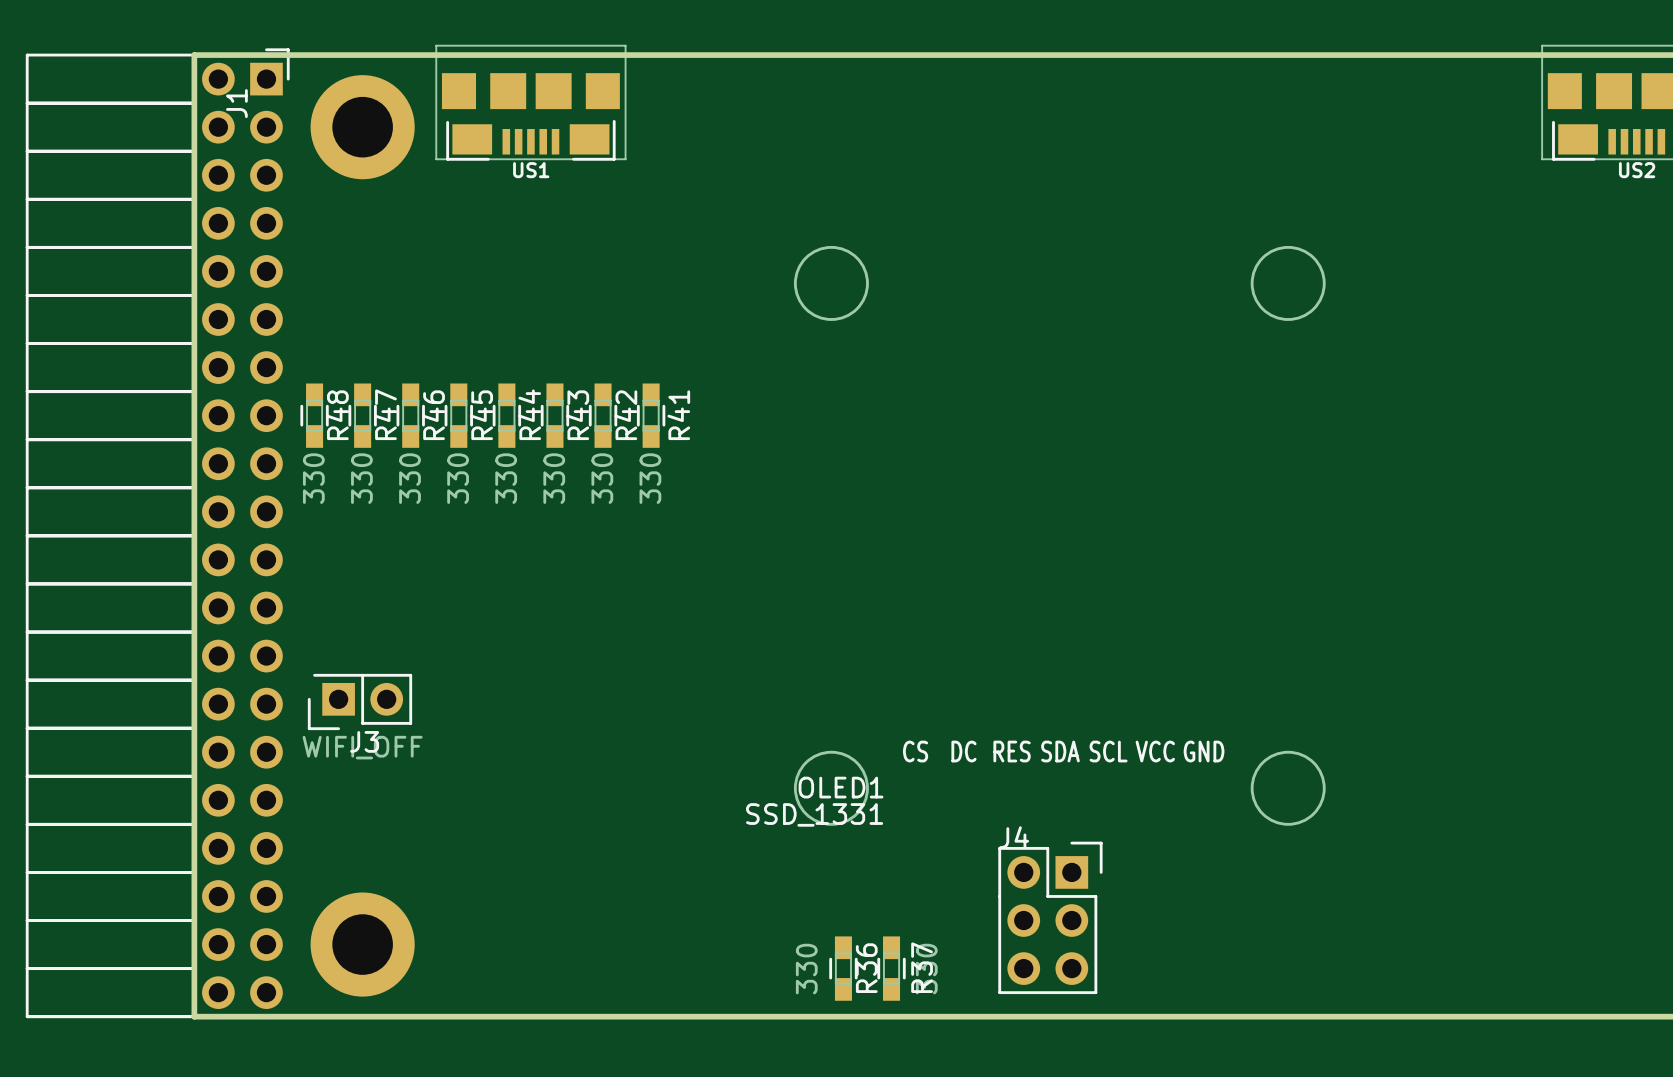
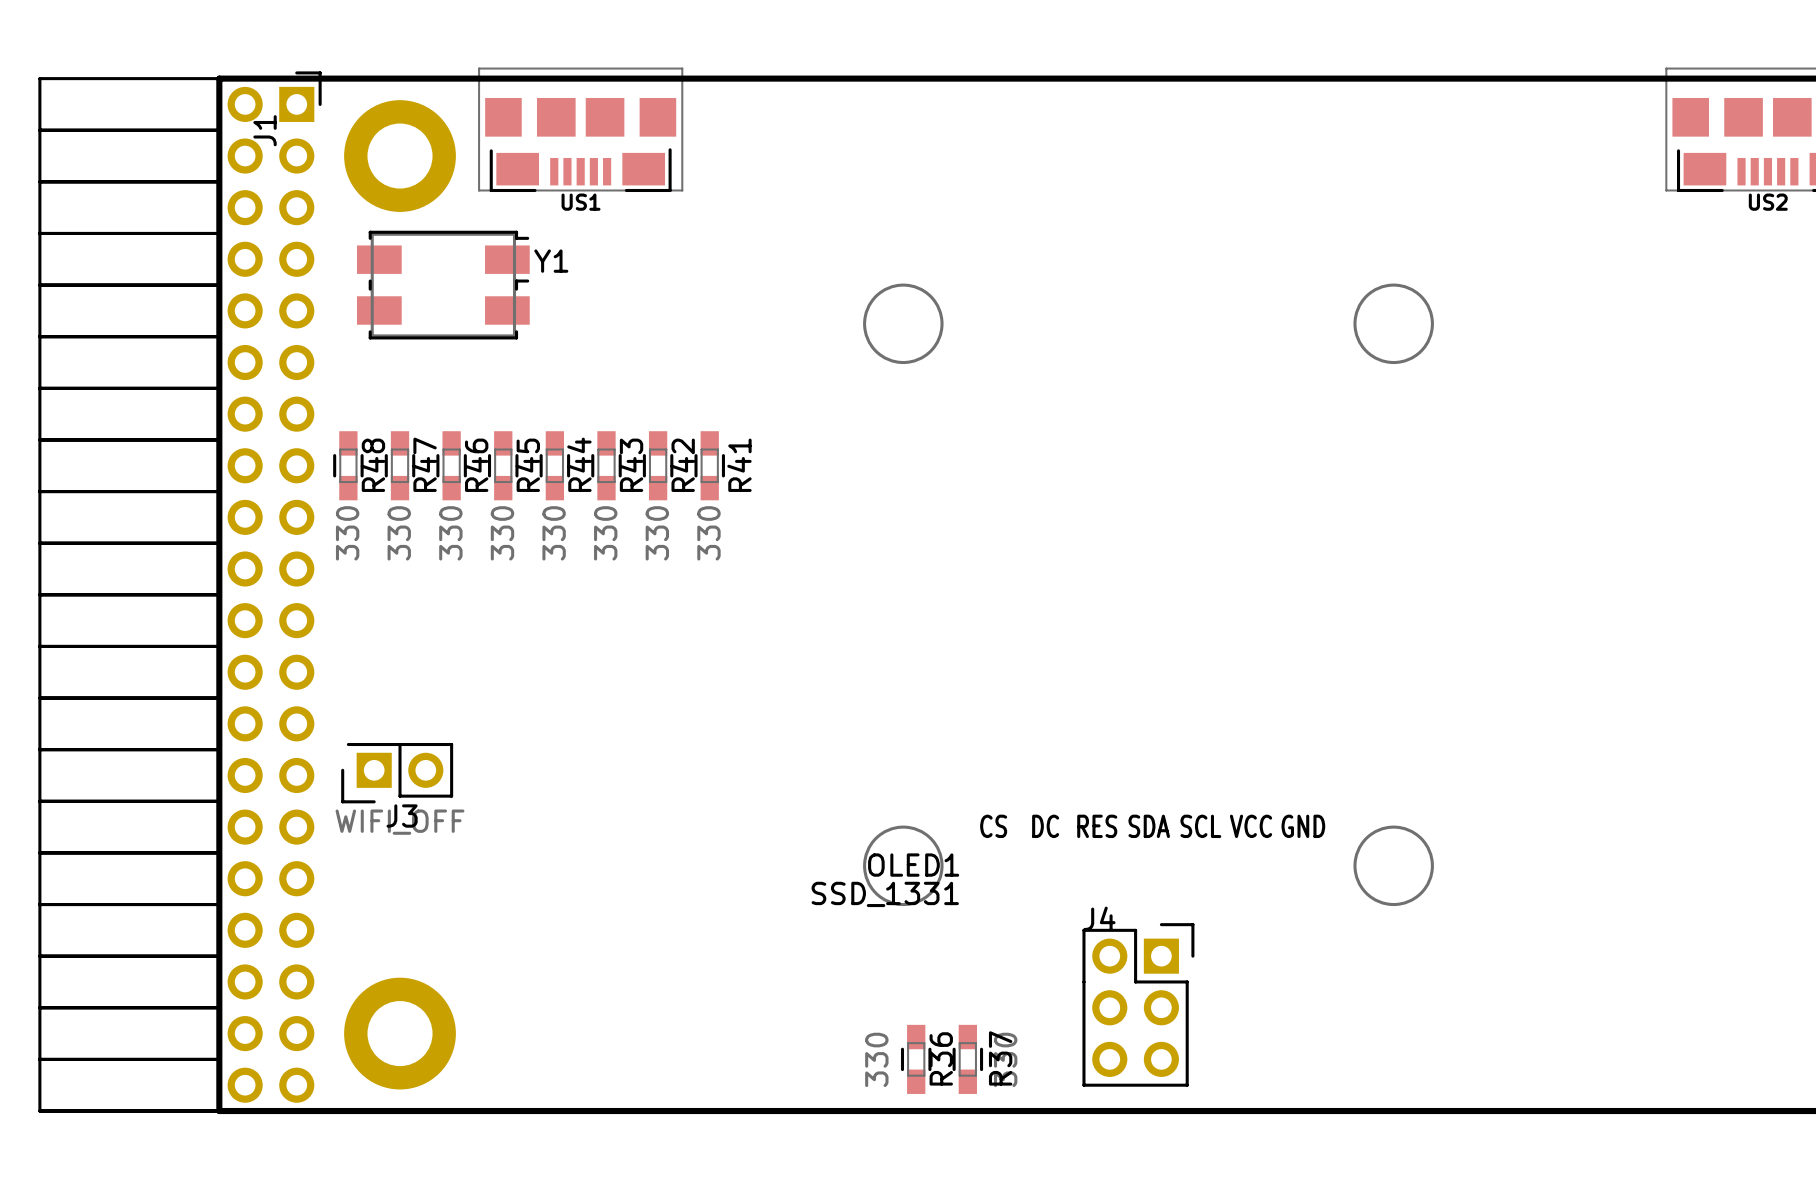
Y1: none -> (443, 285)

